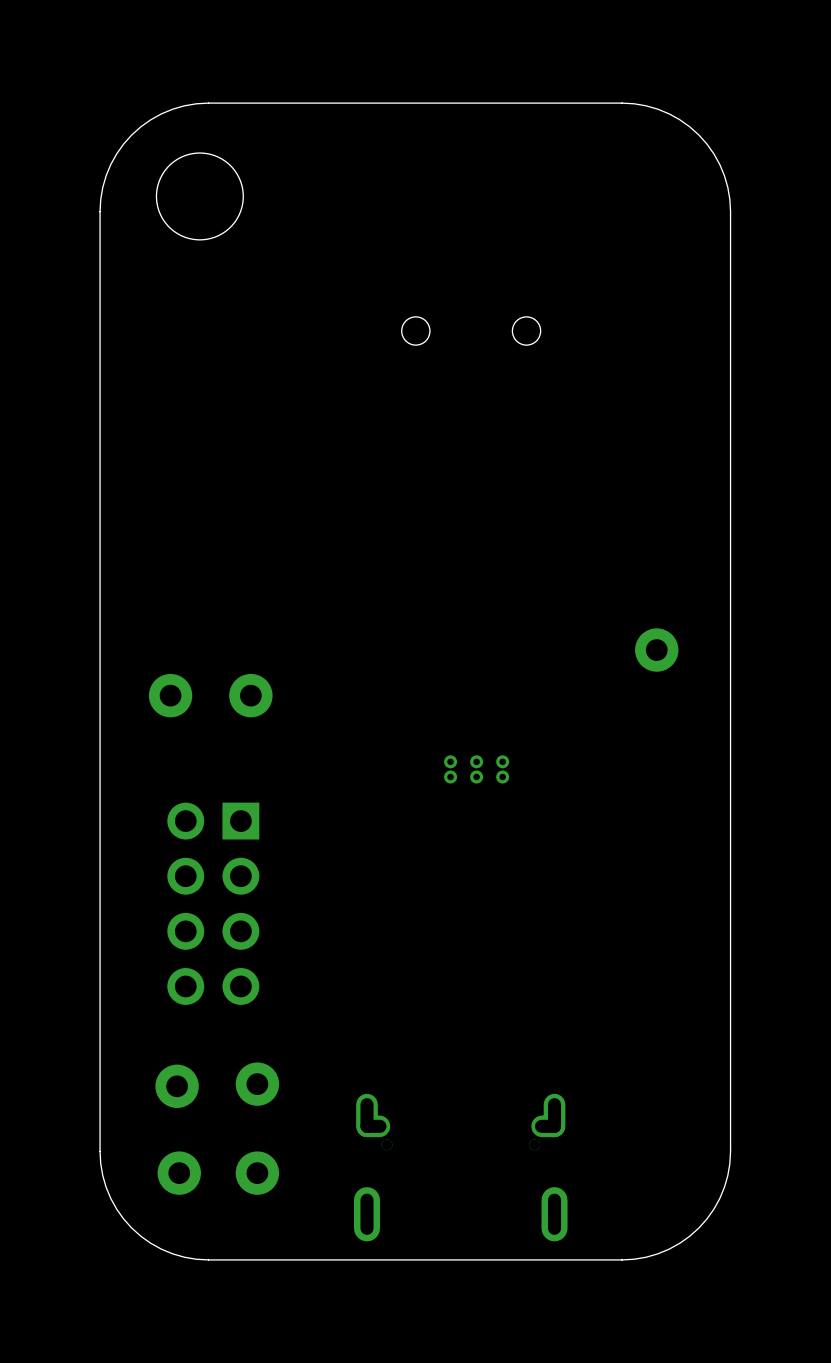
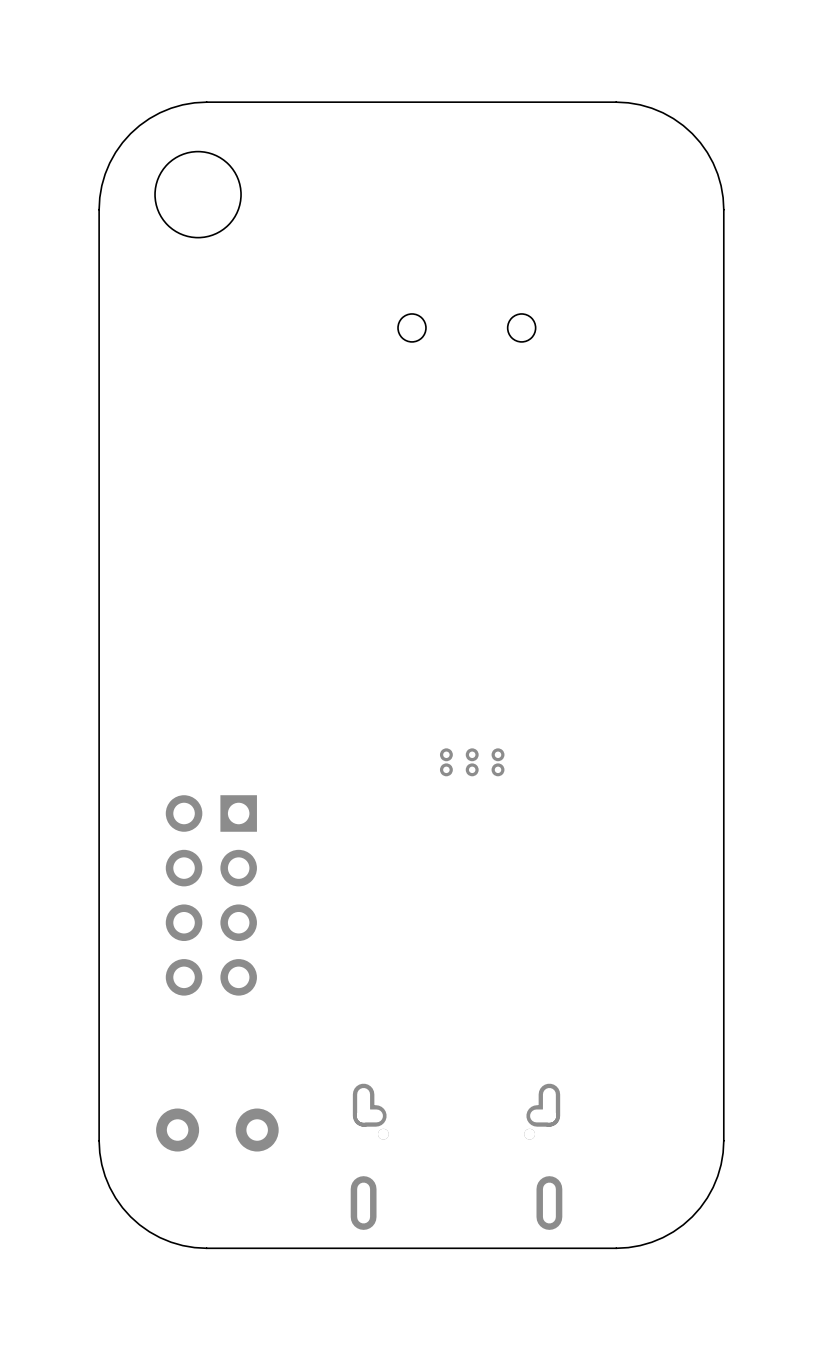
part: (656, 650) -> none
part: (170, 695) -> none
part: (250, 695) -> none
part: (257, 1084) -> none
part: (177, 1086) -> none
part: none -> (177, 1130)
part: none -> (257, 1130)
part: (179, 1173) -> none
part: (257, 1173) -> none

